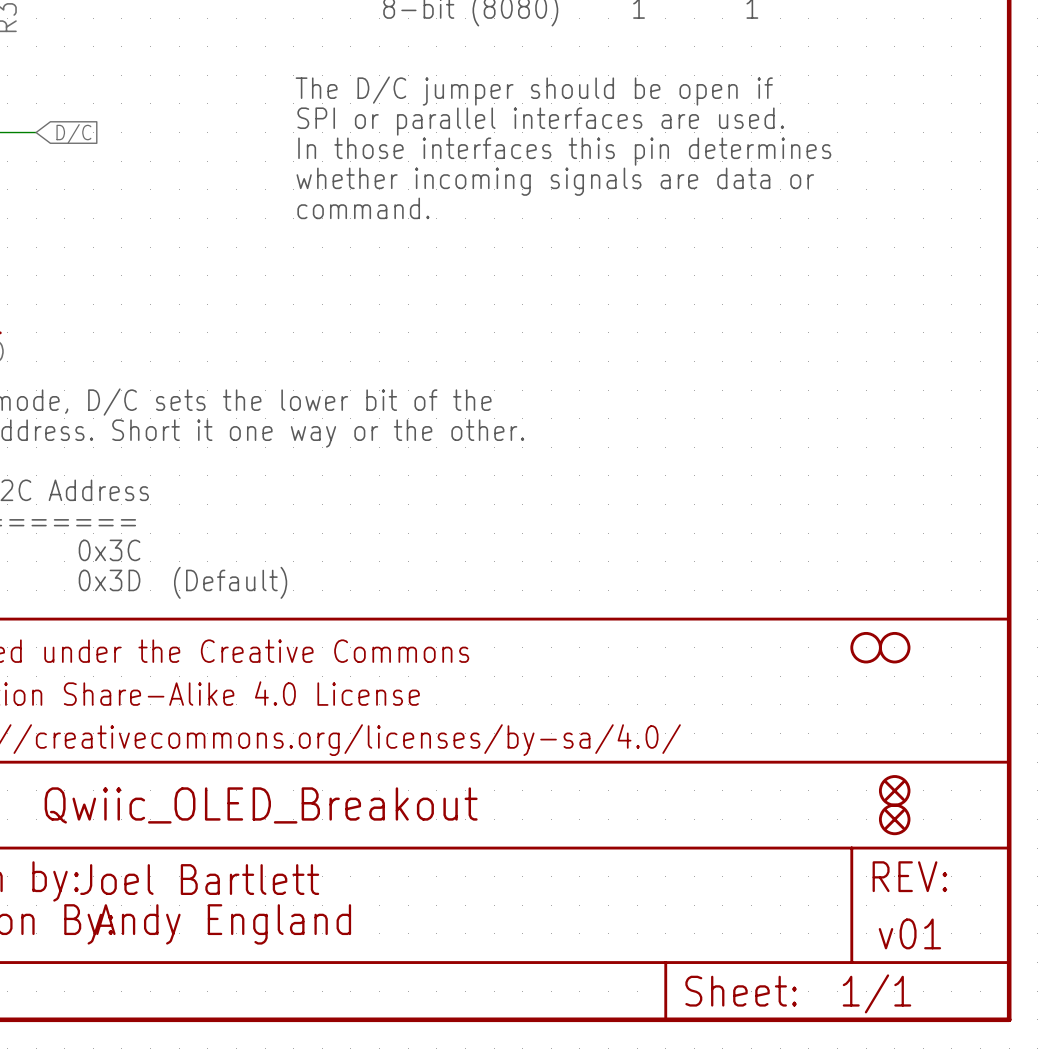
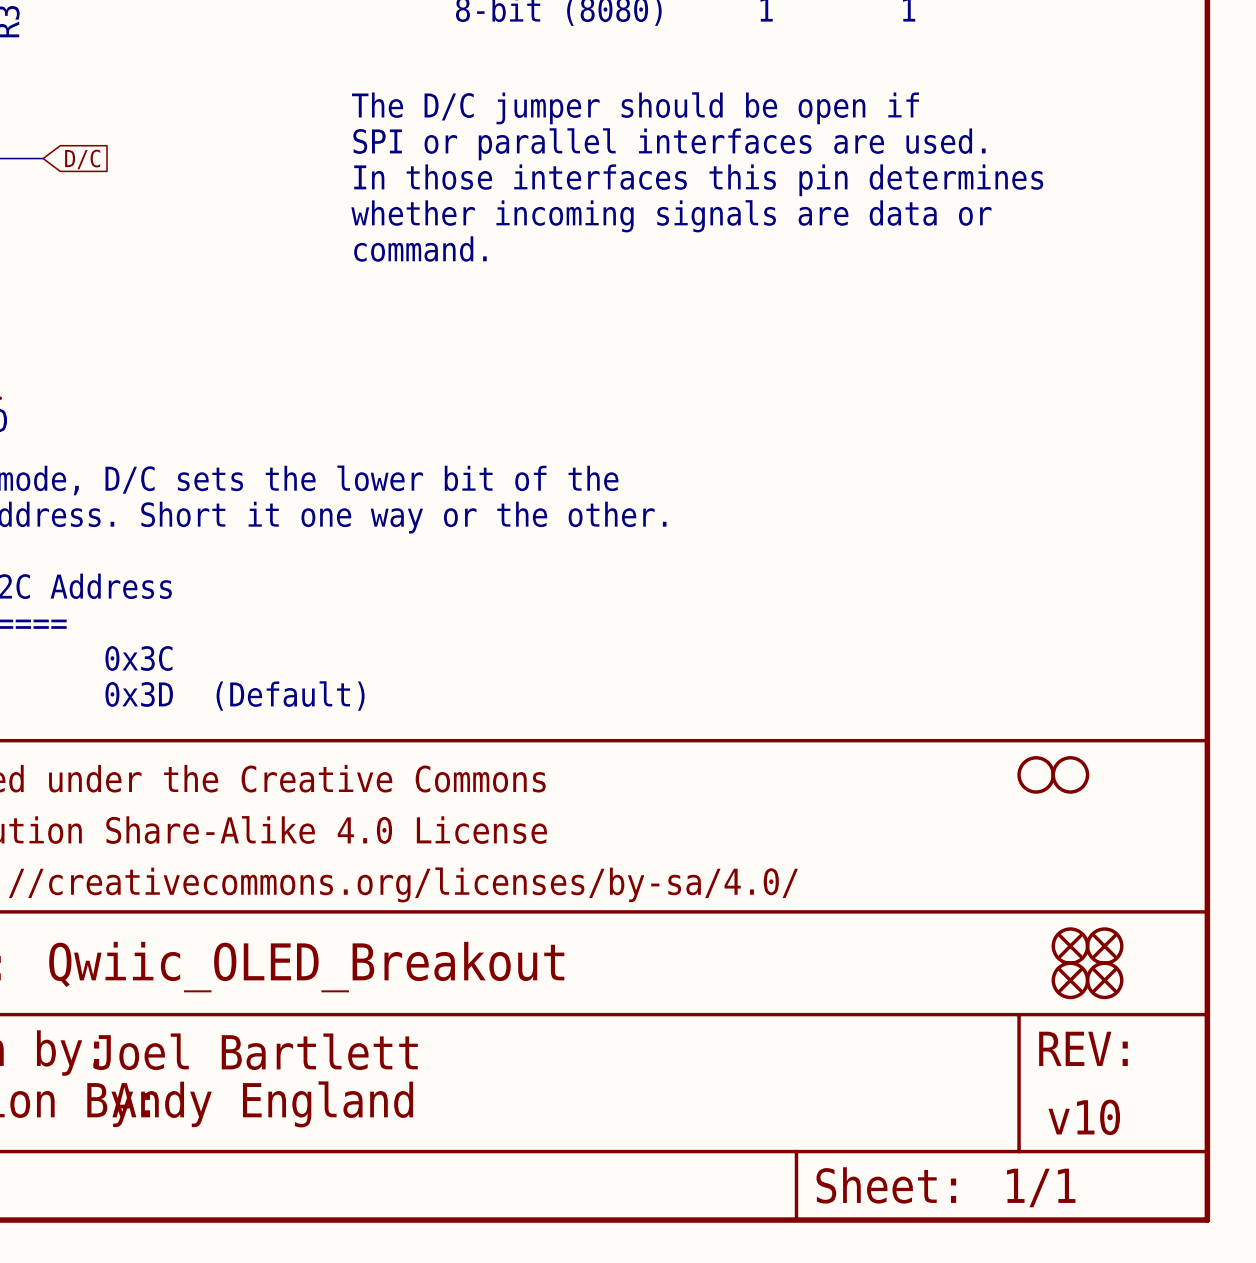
part: none -> (1104, 946)
part: none -> (1104, 980)
text: v01 (909, 933) -> v10 (1084, 1117)

